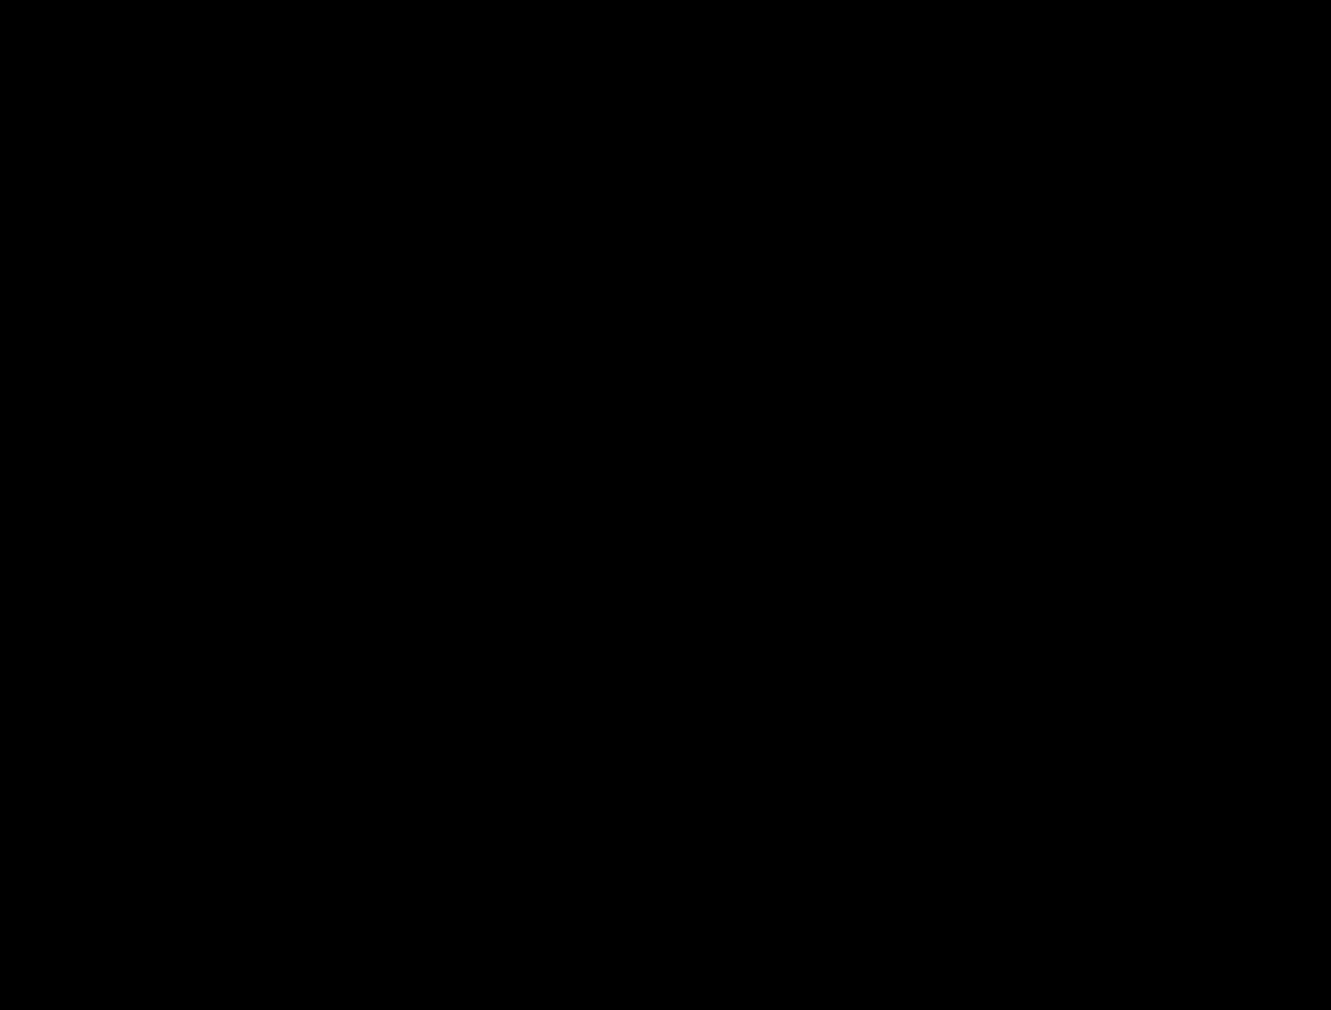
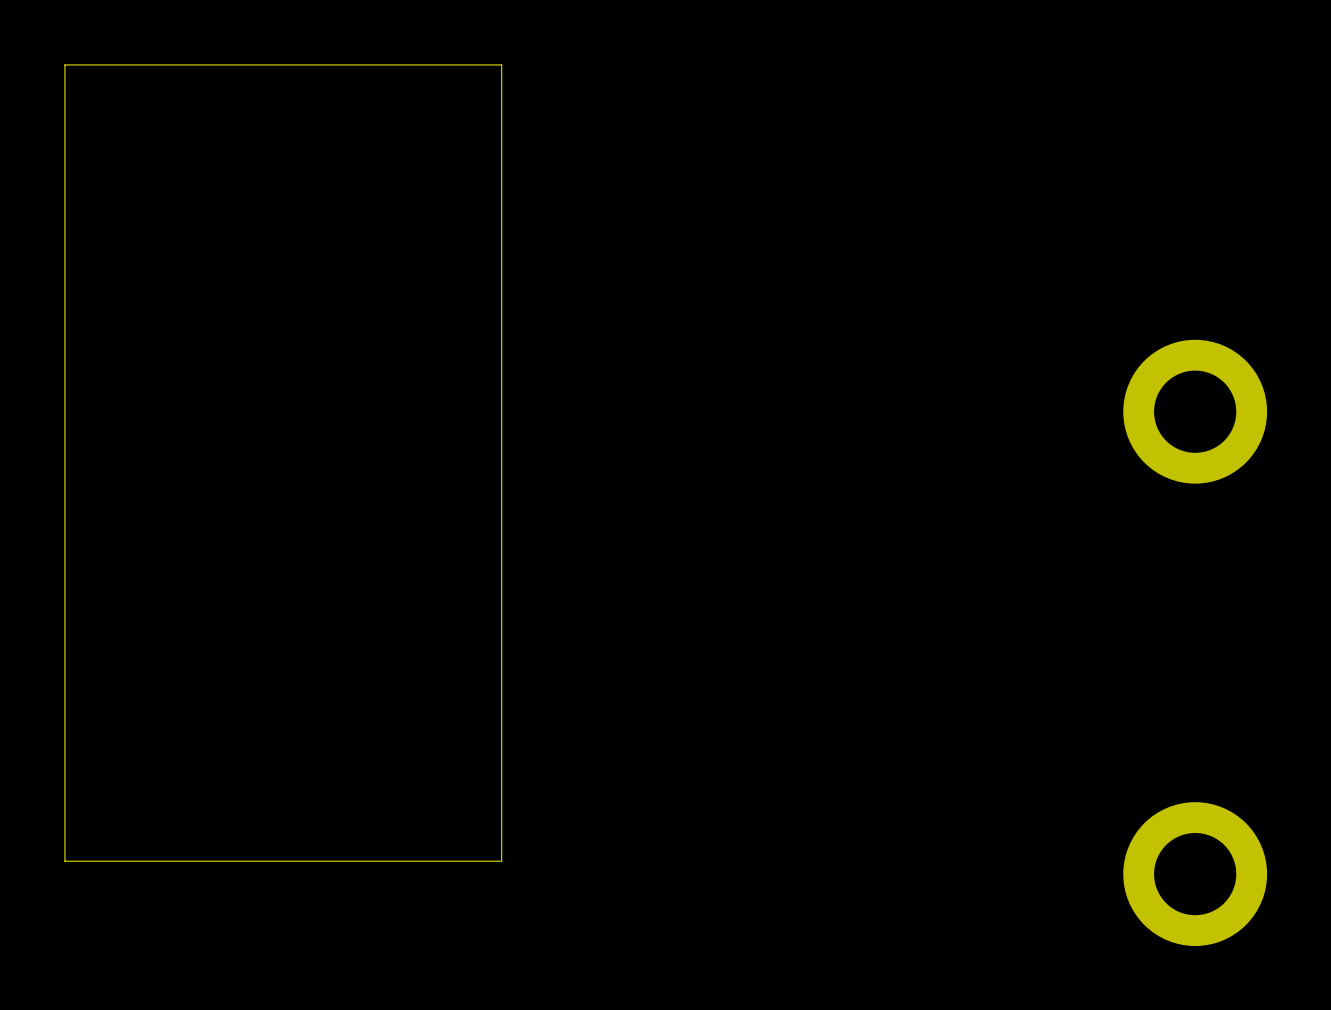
board edge: none -> (501, 64) (64, 64) (64, 861) (501, 861) (501, 64)
part: none -> (1195, 411)
part: none -> (1195, 874)

